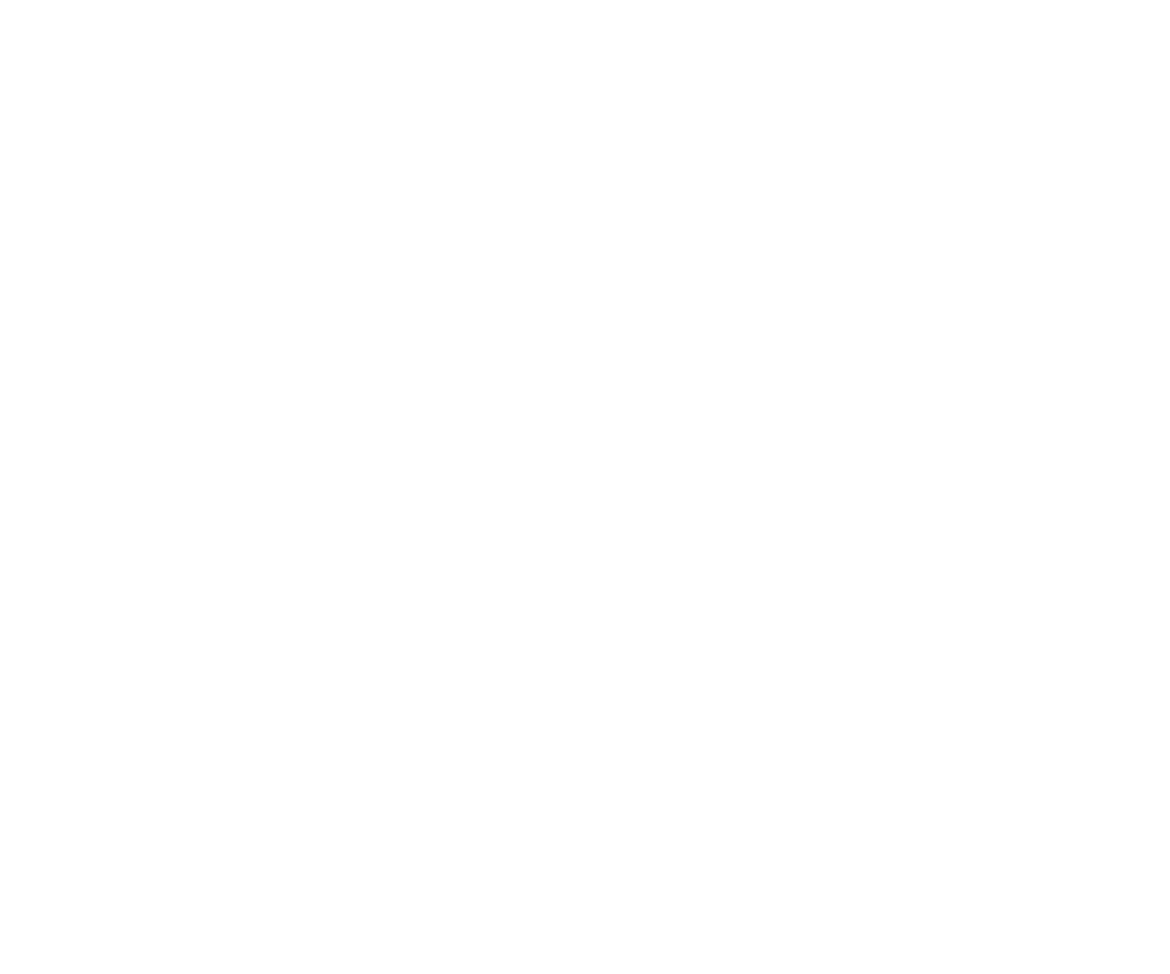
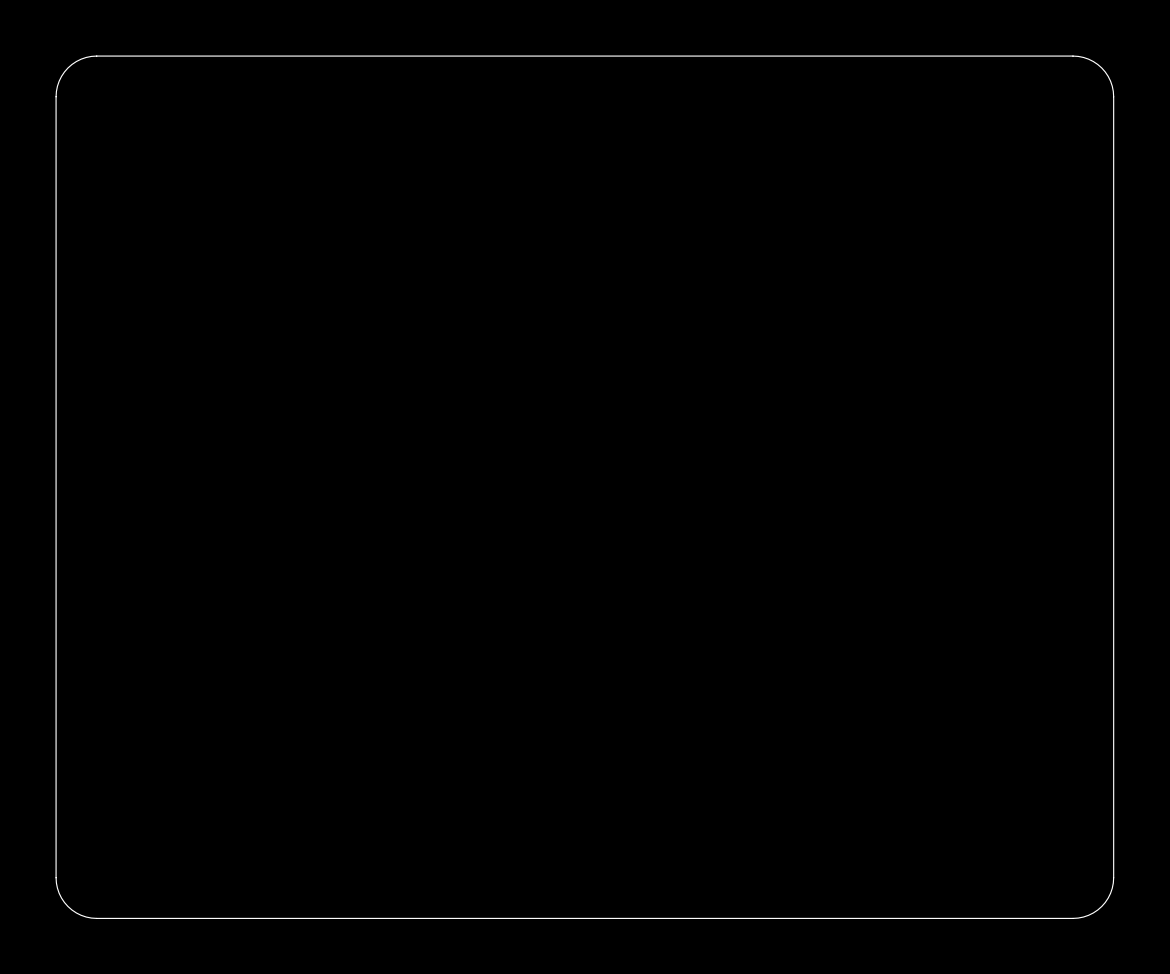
board edge: none -> (96, 56) (1072, 56) (1088, 59) (1097, 64) (1110, 81) (1113, 96) (1113, 877) (1110, 893) (1105, 902) (1088, 915) (1072, 918) (96, 918) (81, 915) (71, 910) (59, 893) (56, 877) (56, 96) (59, 81) (67, 67) (81, 59) (96, 56)

